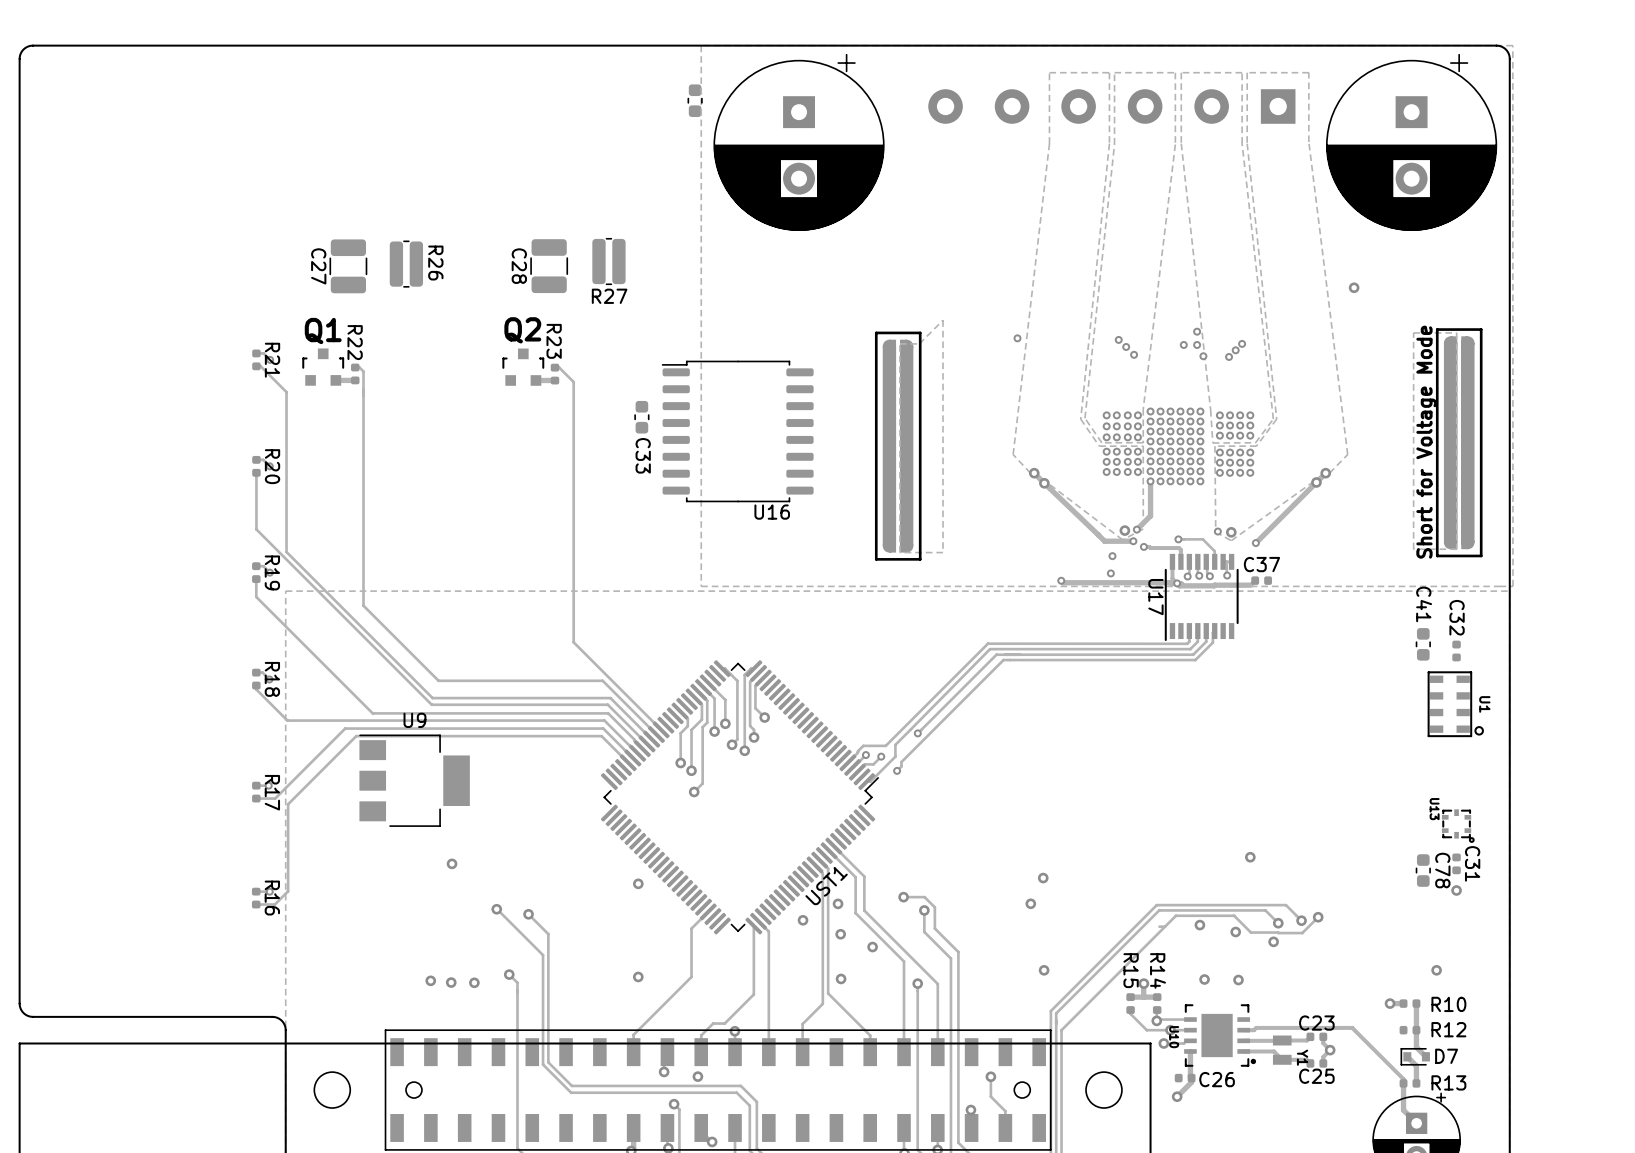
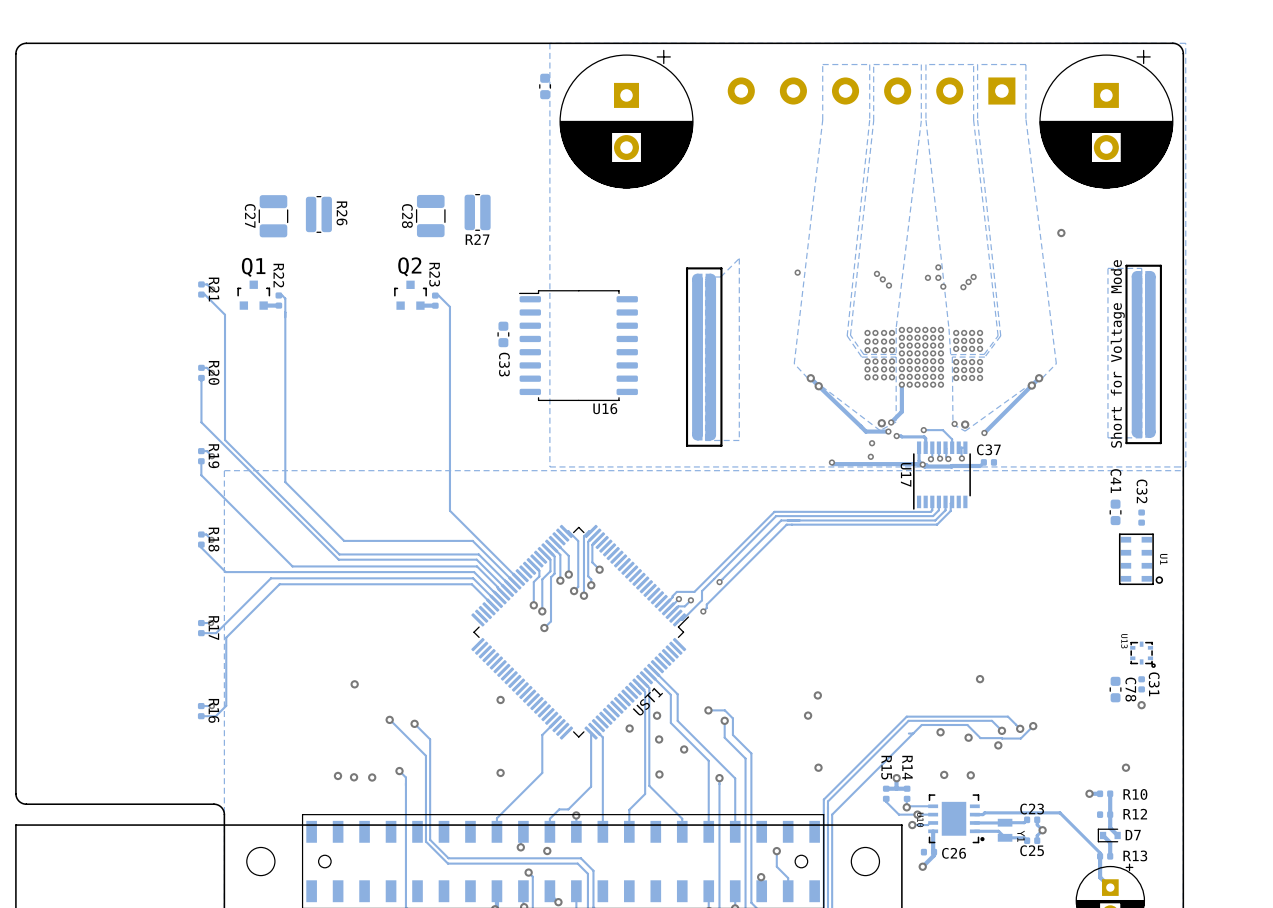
U9: (414, 780) -> none

